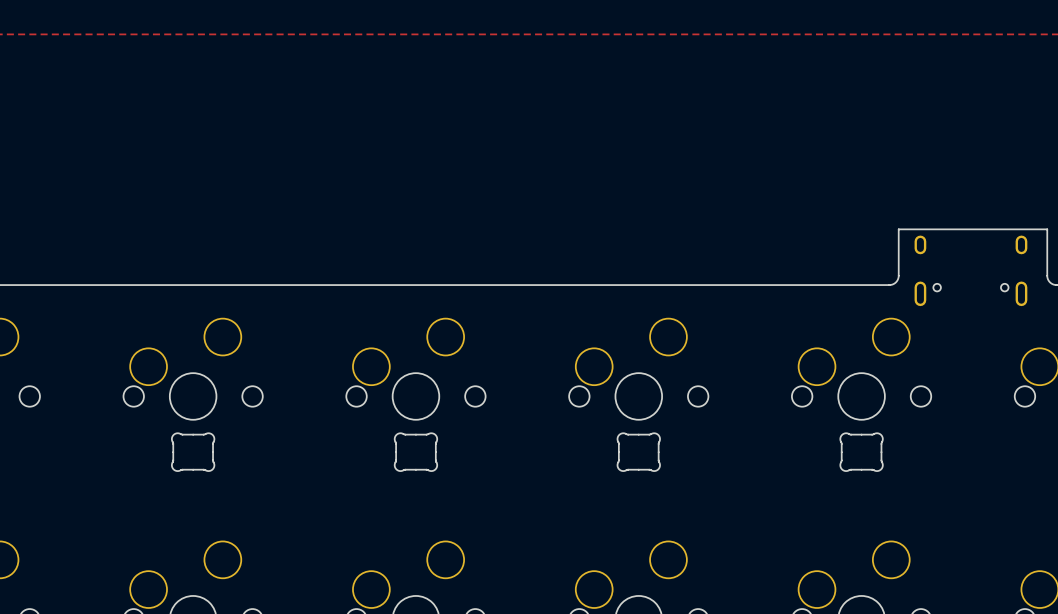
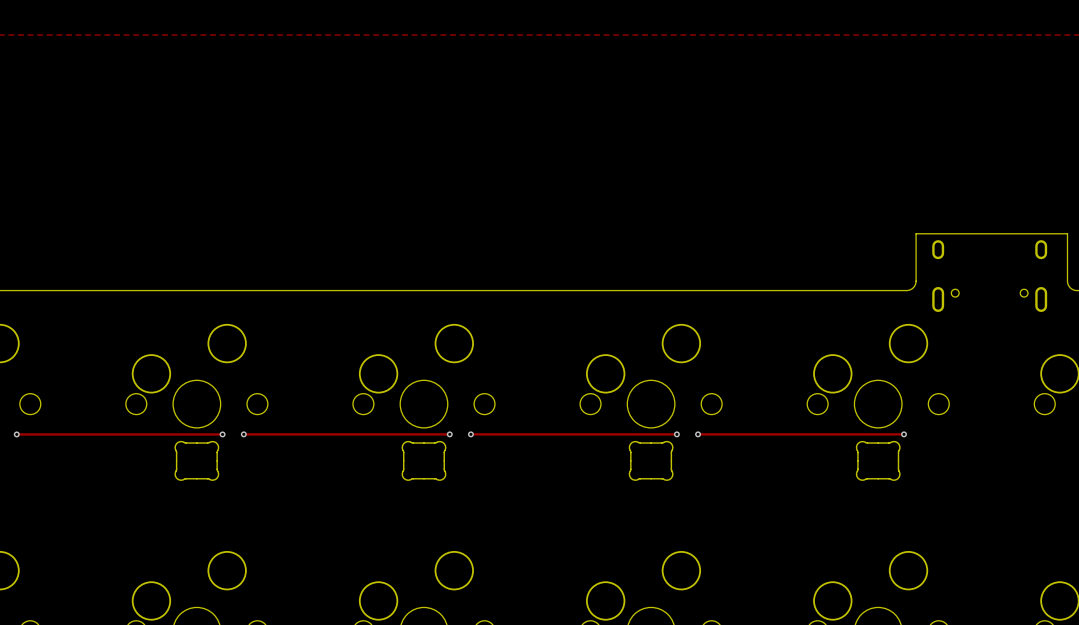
track: none -> (16, 434) (222, 434)
via: none -> (16, 434)
via: none -> (222, 434)
track: none -> (243, 434) (449, 434)
via: none -> (243, 434)
via: none -> (449, 434)
track: none -> (470, 434) (676, 434)
via: none -> (470, 434)
via: none -> (676, 434)
track: none -> (698, 434) (904, 434)
via: none -> (698, 434)
via: none -> (904, 434)

